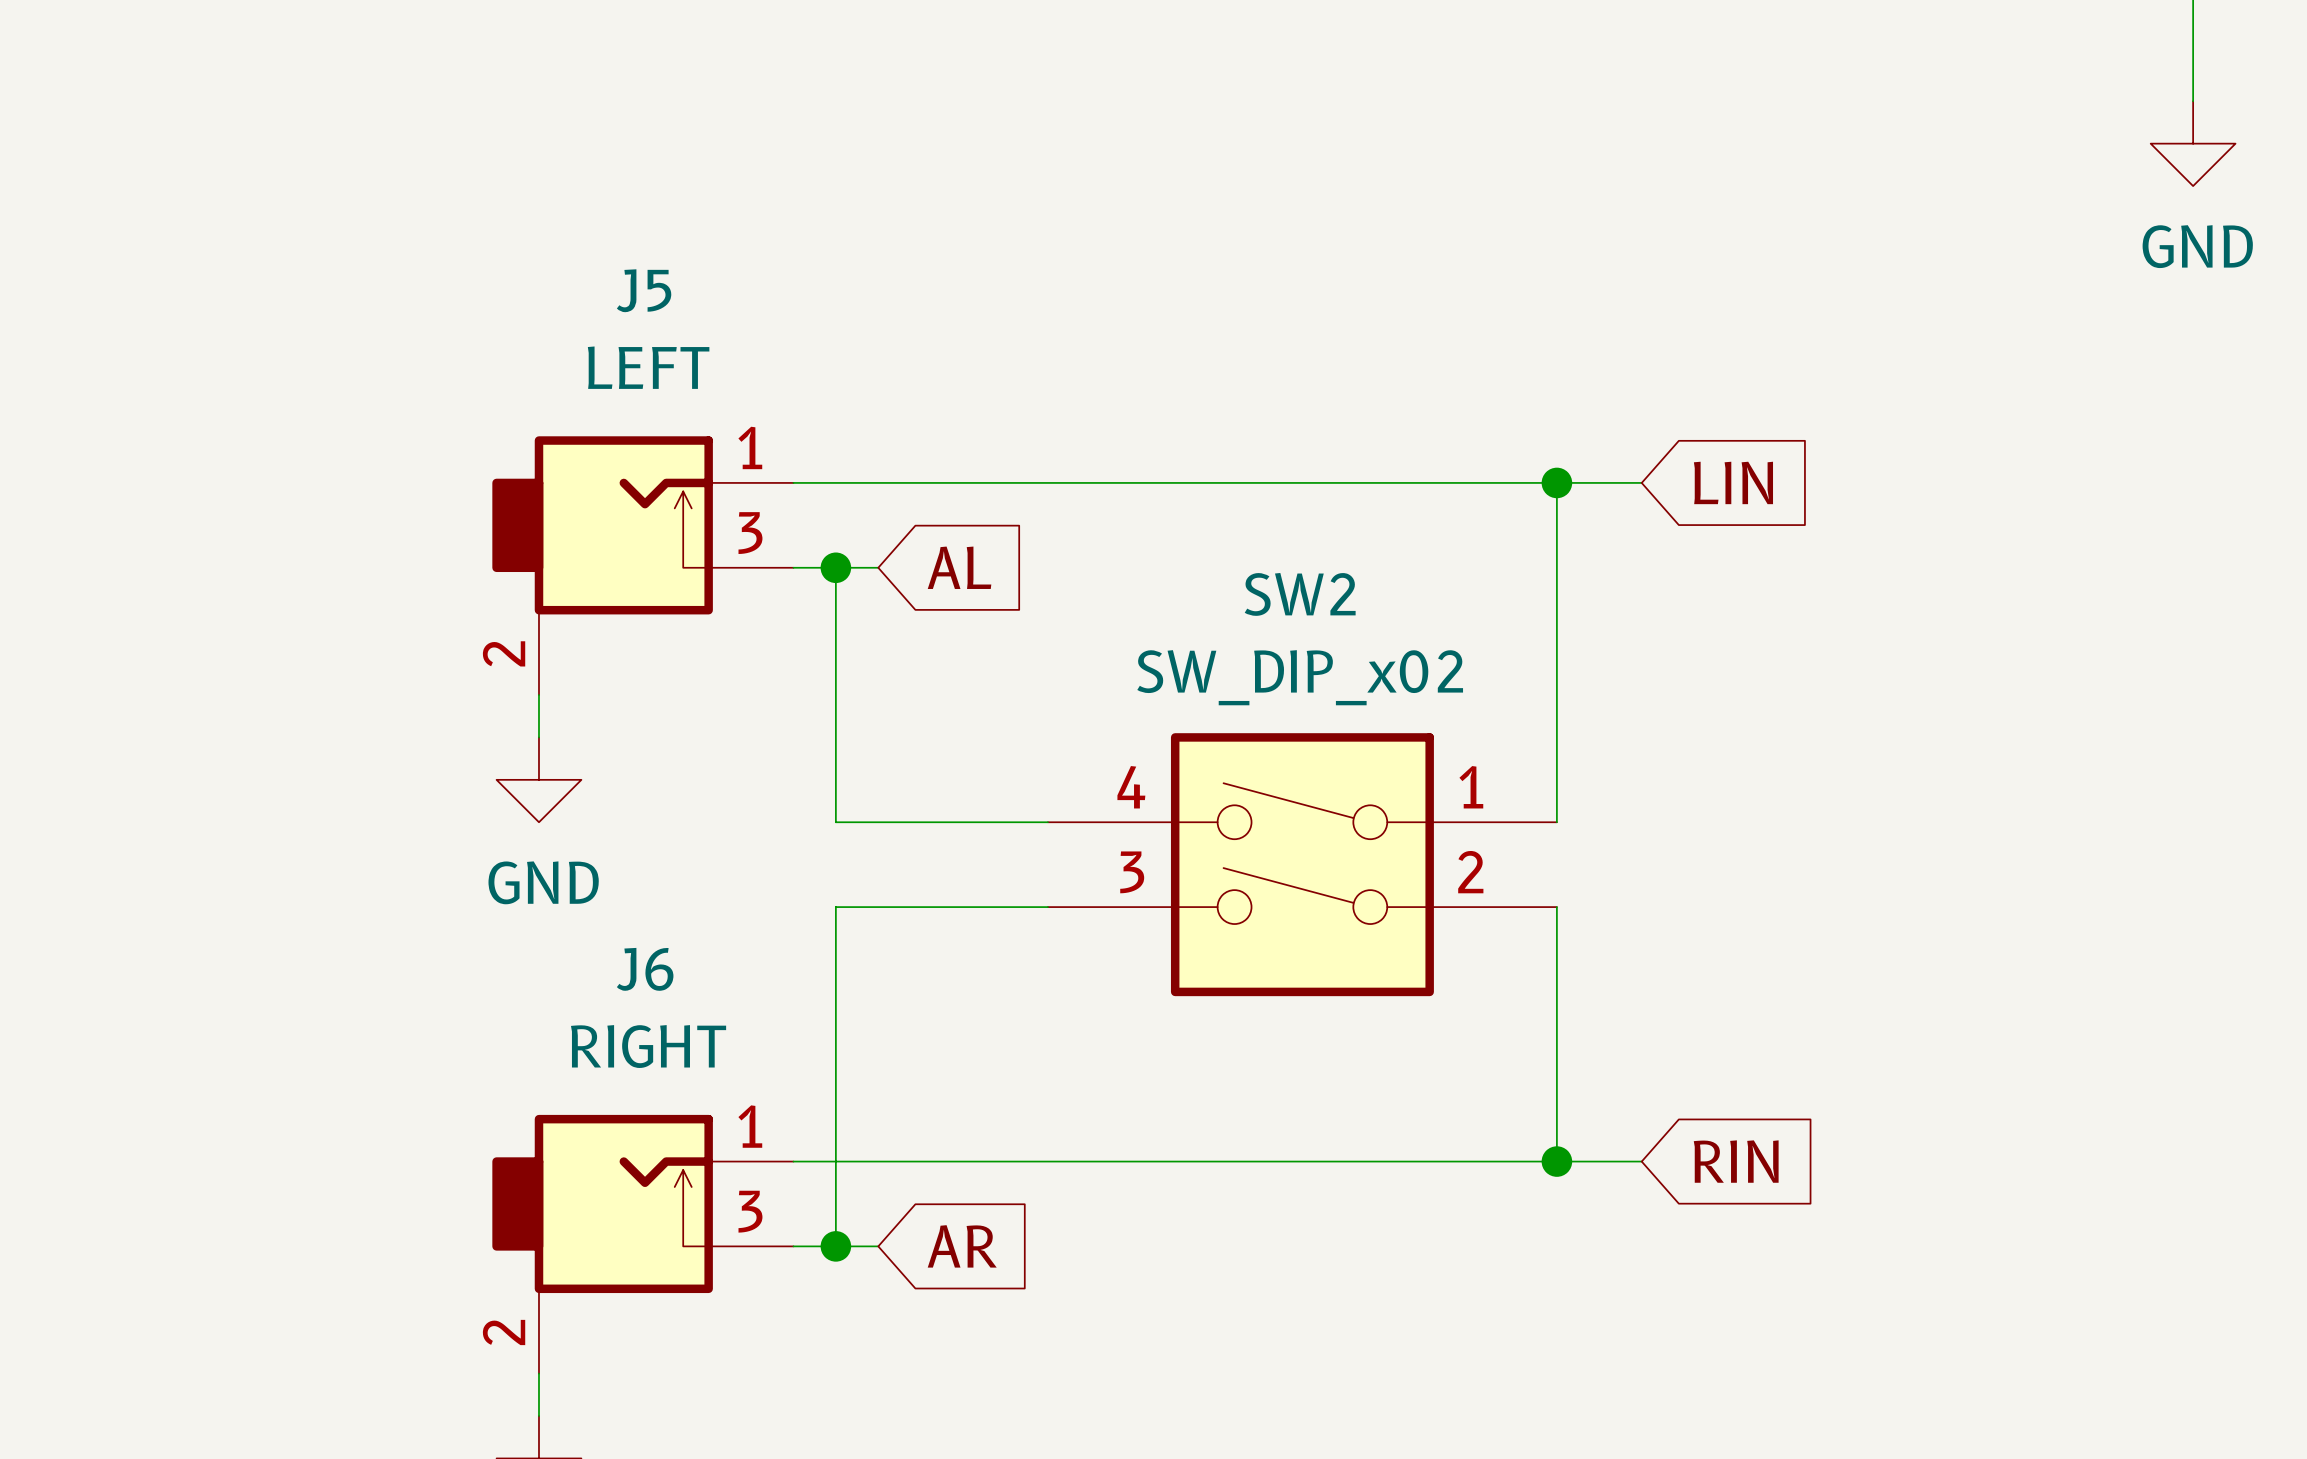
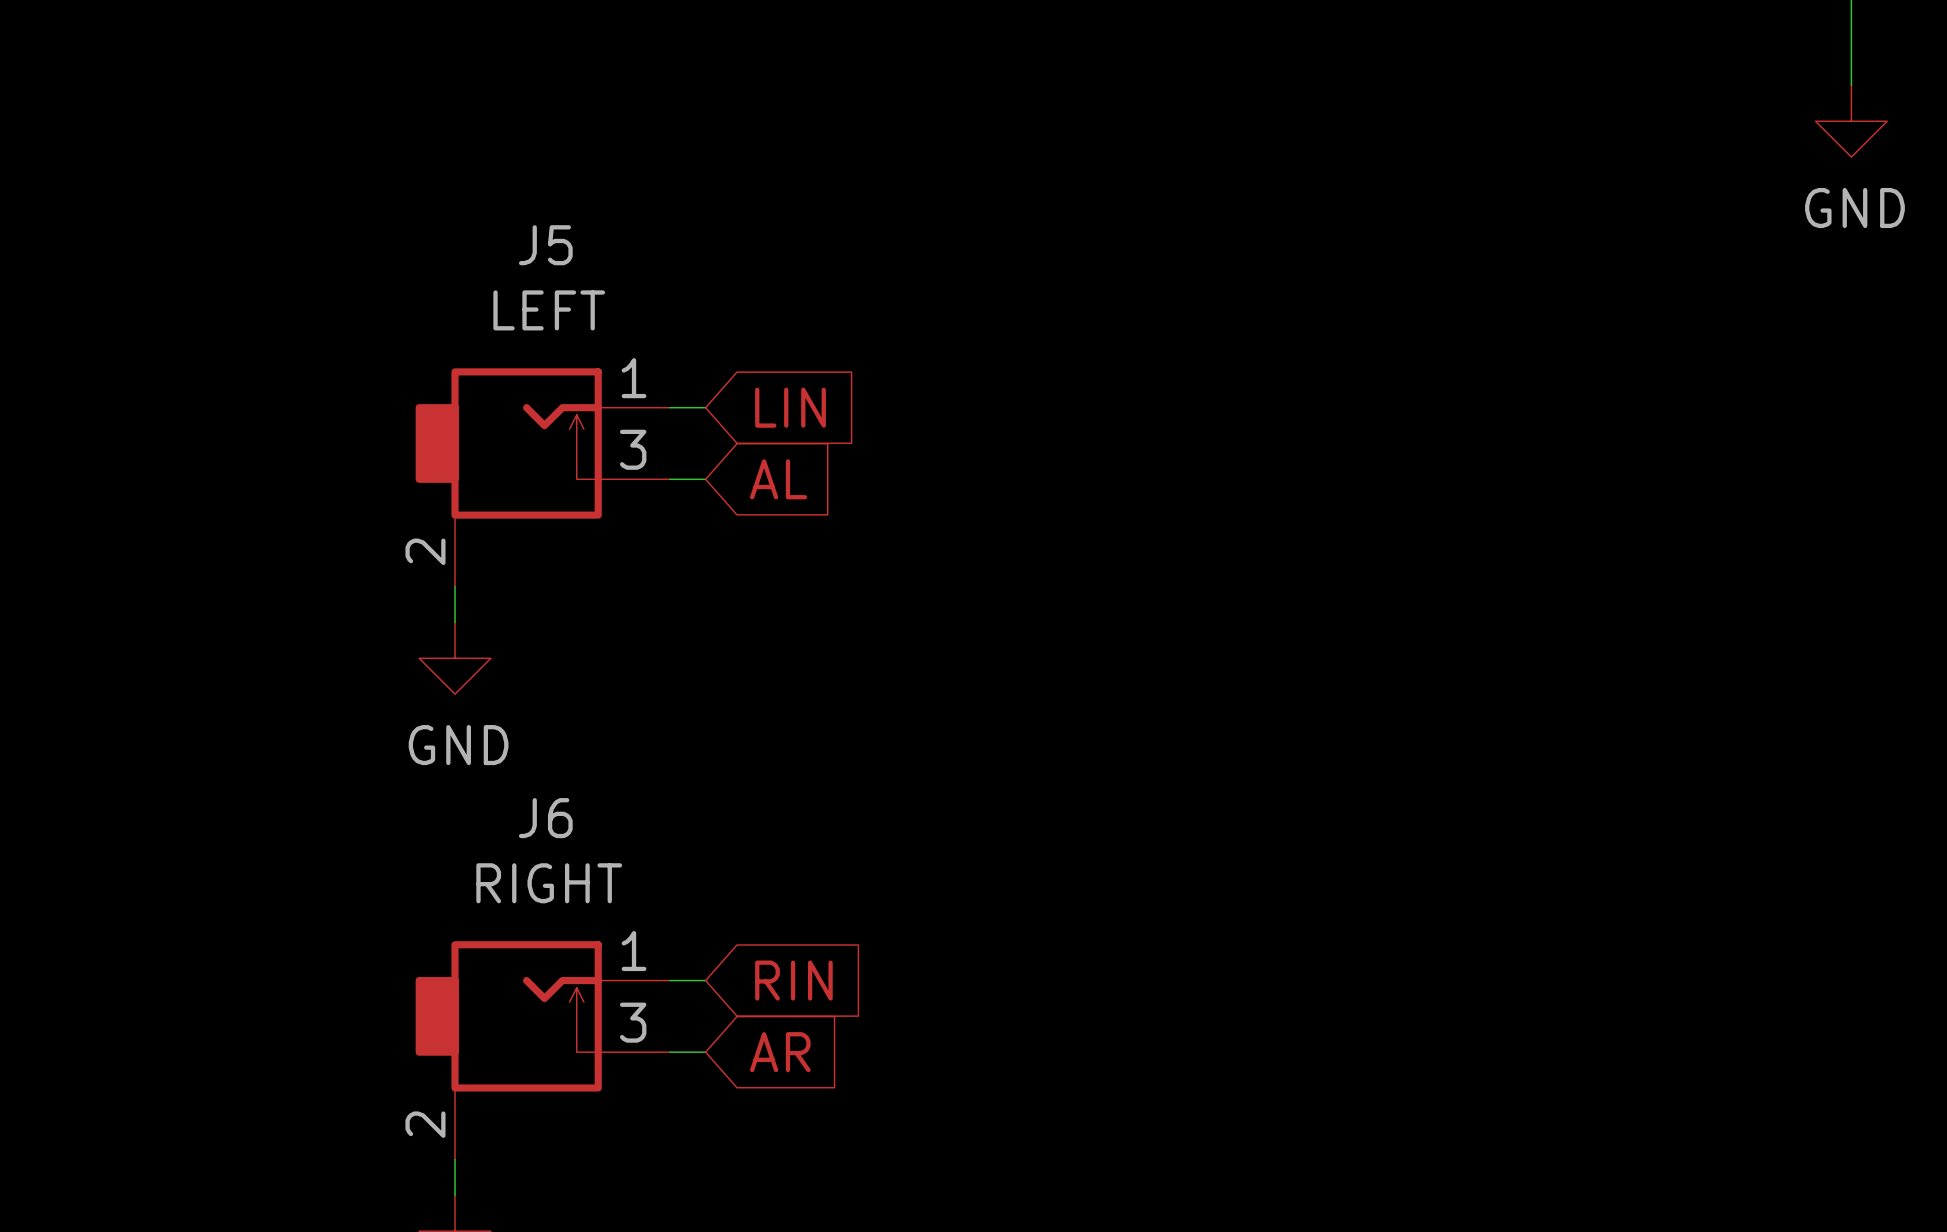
wire: (835, 482) (1641, 482) -> none
wire: (1556, 482) (1556, 822) -> none
junction: (1556, 482) -> none
global label position: LIN (1733, 482) -> LIN (790, 407)
junction: (835, 567) -> none
wire: (878, 567) (835, 567) (835, 822) (1047, 822) -> none
global label position: AL (959, 567) -> AL (778, 479)
SW2: SW_DIP_x02 (1302, 864) -> none
wire: (1047, 907) (835, 907) (835, 1246) (878, 1246) -> none
wire: (1556, 907) (1556, 1161) -> none
wire: (835, 1161) (1641, 1161) -> none
junction: (1556, 1161) -> none
global label position: RIN (1736, 1161) -> RIN (793, 980)
junction: (835, 1246) -> none
global label position: AR (962, 1246) -> AR (780, 1052)

